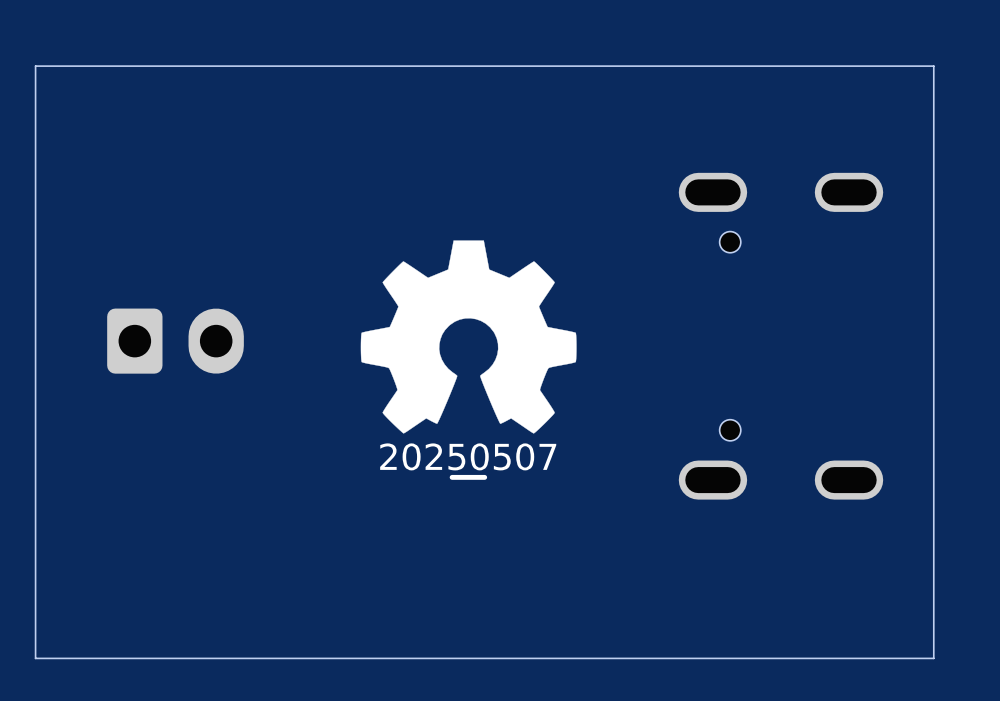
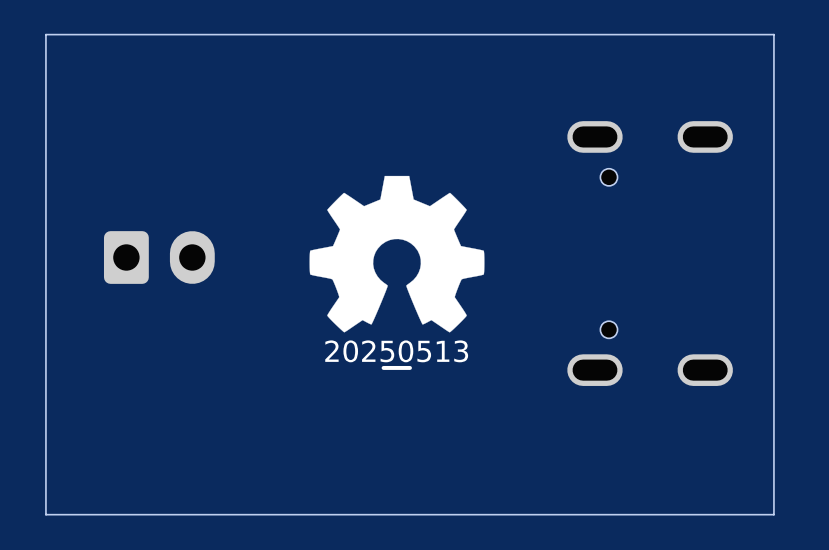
drawing shape: [380, 443, 557, 480] -> [325, 340, 469, 370]

